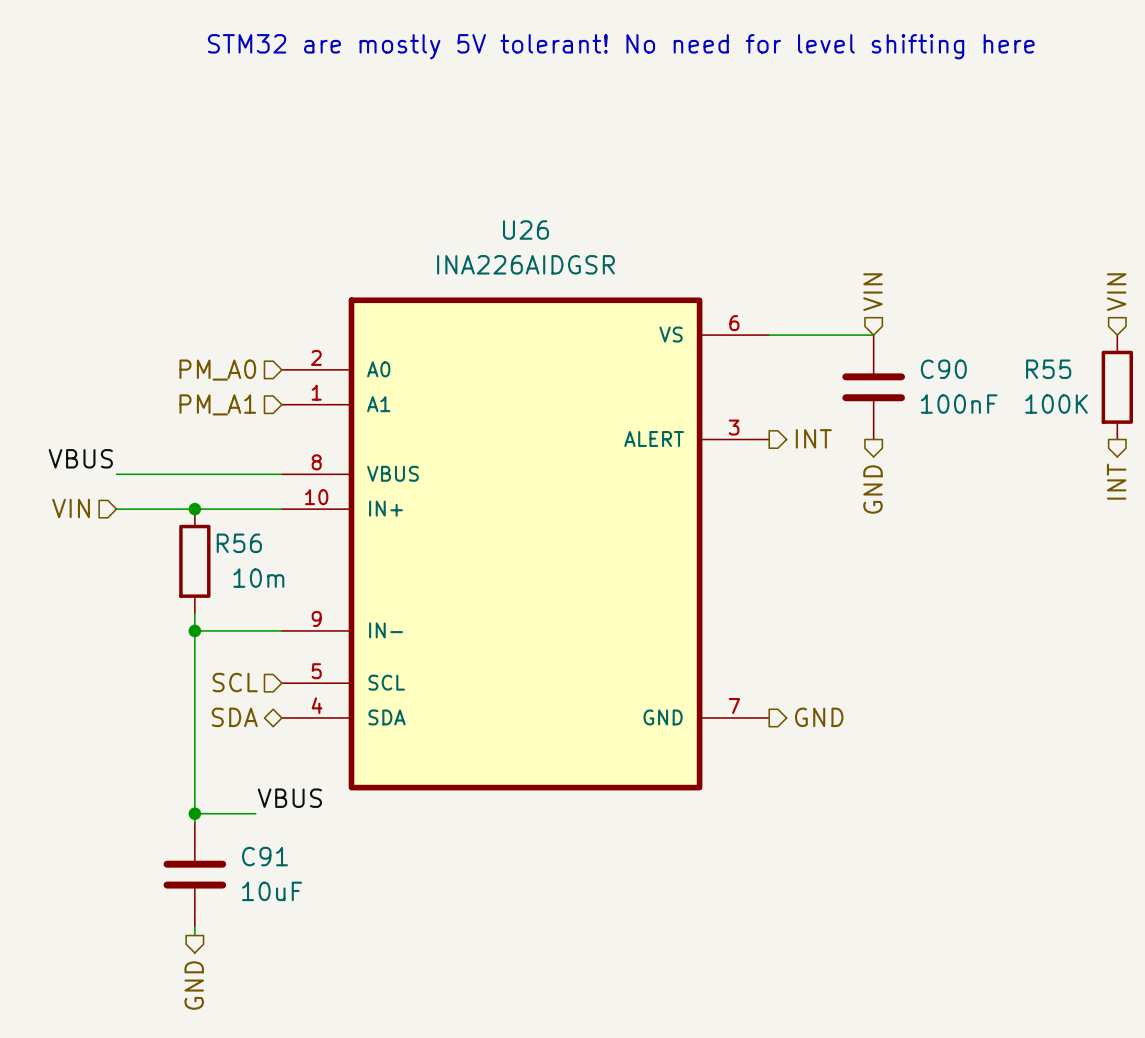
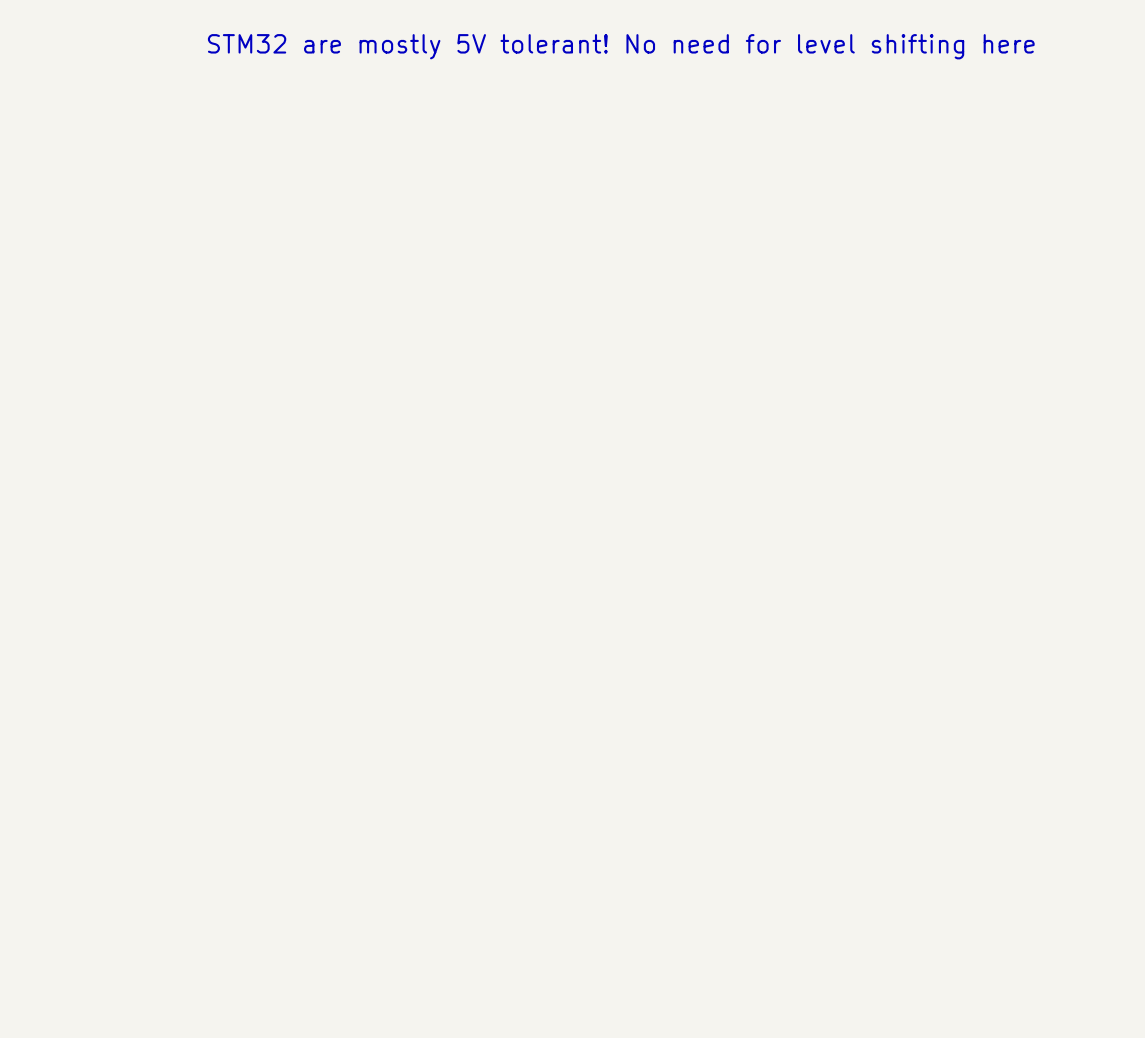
hierarchical label: VIN (872, 292) -> none
hierarchical label: VIN (1116, 292) -> none
wire: (769, 335) (873, 335) -> none
hierarchical label: PM_A0 (217, 370) -> none
C90: 100nF (873, 387) -> none
R55: 100K (1117, 387) -> none
hierarchical label: PM_A1 (217, 404) -> none
hierarchical label: INT (813, 438) -> none
label: VBUS (80, 458) -> none
wire: (116, 474) (281, 474) -> none
hierarchical label: INT (1116, 481) -> none
hierarchical label: GND (872, 489) -> none
hierarchical label: VIN (71, 508) -> none
wire: (116, 509) (281, 509) -> none
junction: (194, 509) -> none
U26: INA226AIDGSR (525, 543) -> none
R56: 10m (194, 561) -> none
wire: (194, 613) (194, 822) -> none
wire: (194, 630) (281, 630) -> none
junction: (194, 630) -> none
hierarchical label: SCL (235, 682) -> none
hierarchical label: SDA (234, 717) -> none
hierarchical label: GND (819, 717) -> none
label: VBUS (289, 798) -> none
wire: (194, 813) (255, 813) -> none
junction: (194, 813) -> none
C91: 10uF (194, 874) -> none
wire: (194, 926) (194, 935) -> none
hierarchical label: GND (194, 985) -> none

